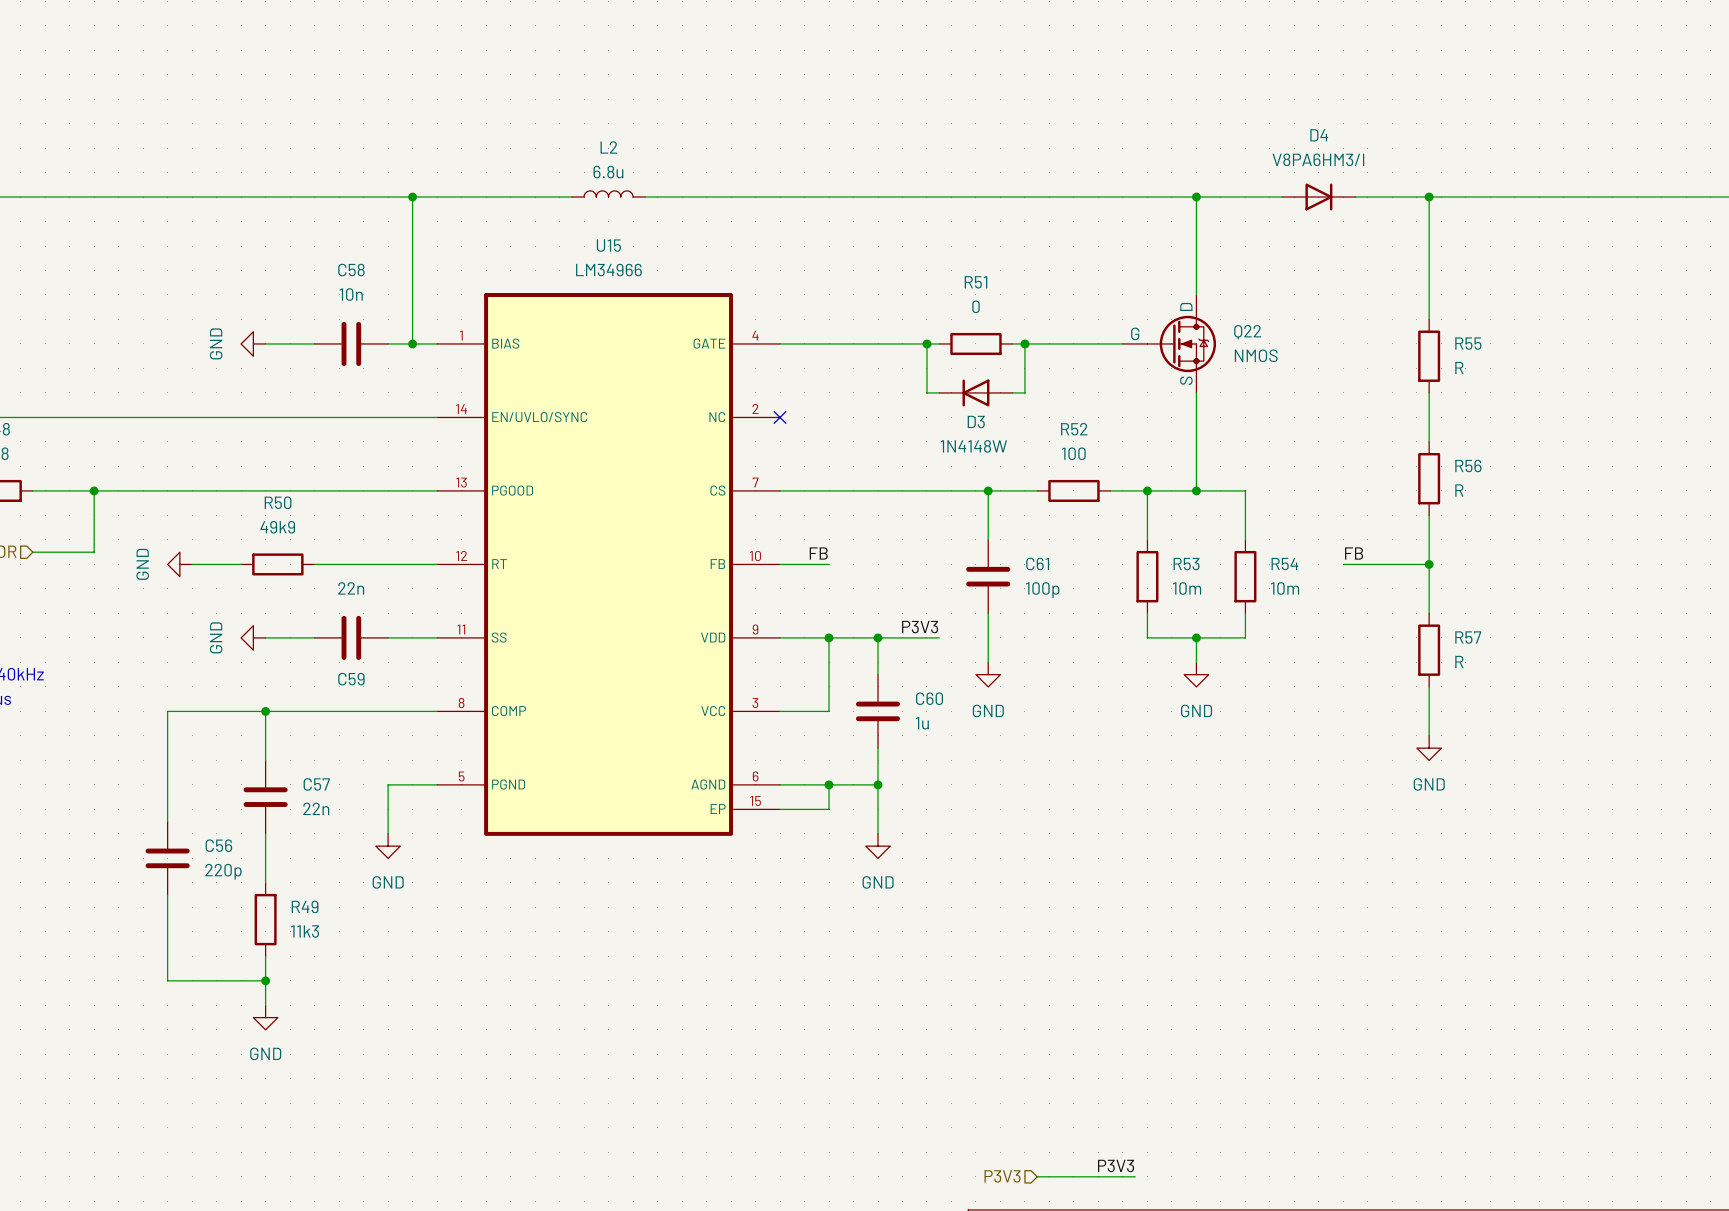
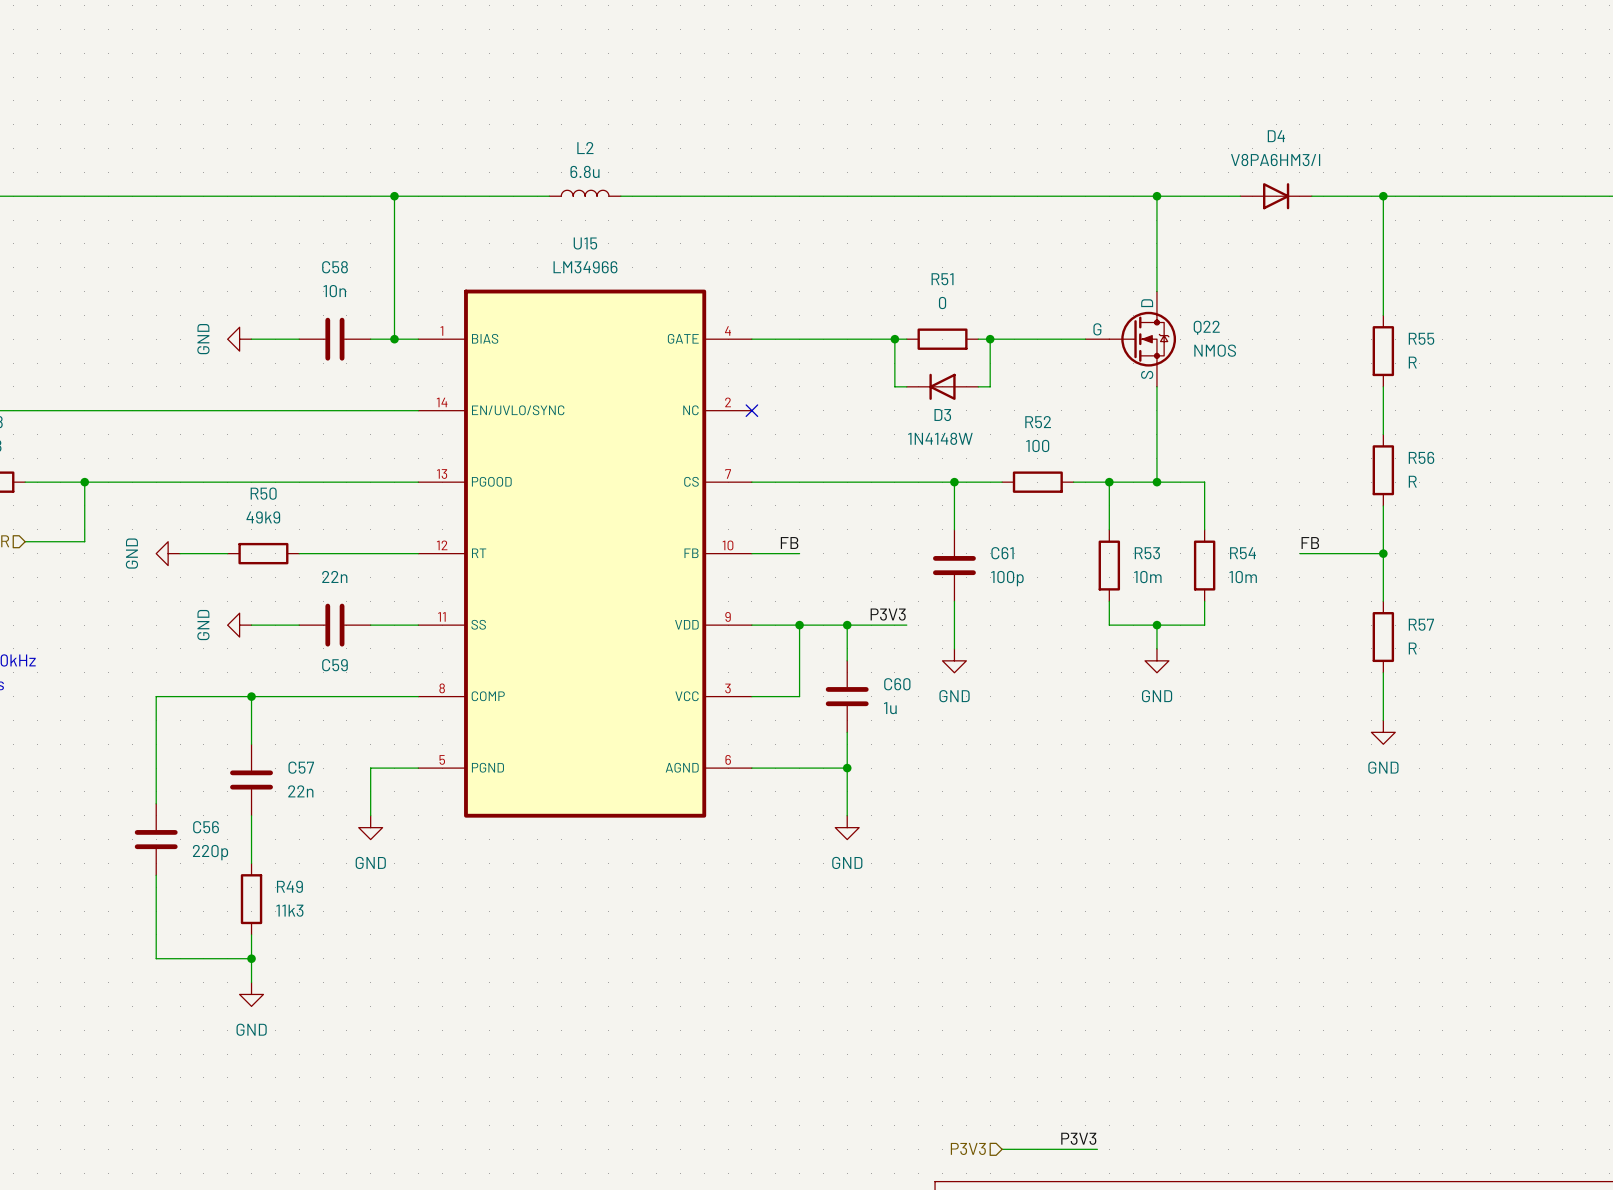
U15 symbol: [437, 293, 781, 836] -> [418, 289, 752, 818]
wire: (829, 784) (829, 809) (780, 809) -> none
junction: (829, 784) -> none

